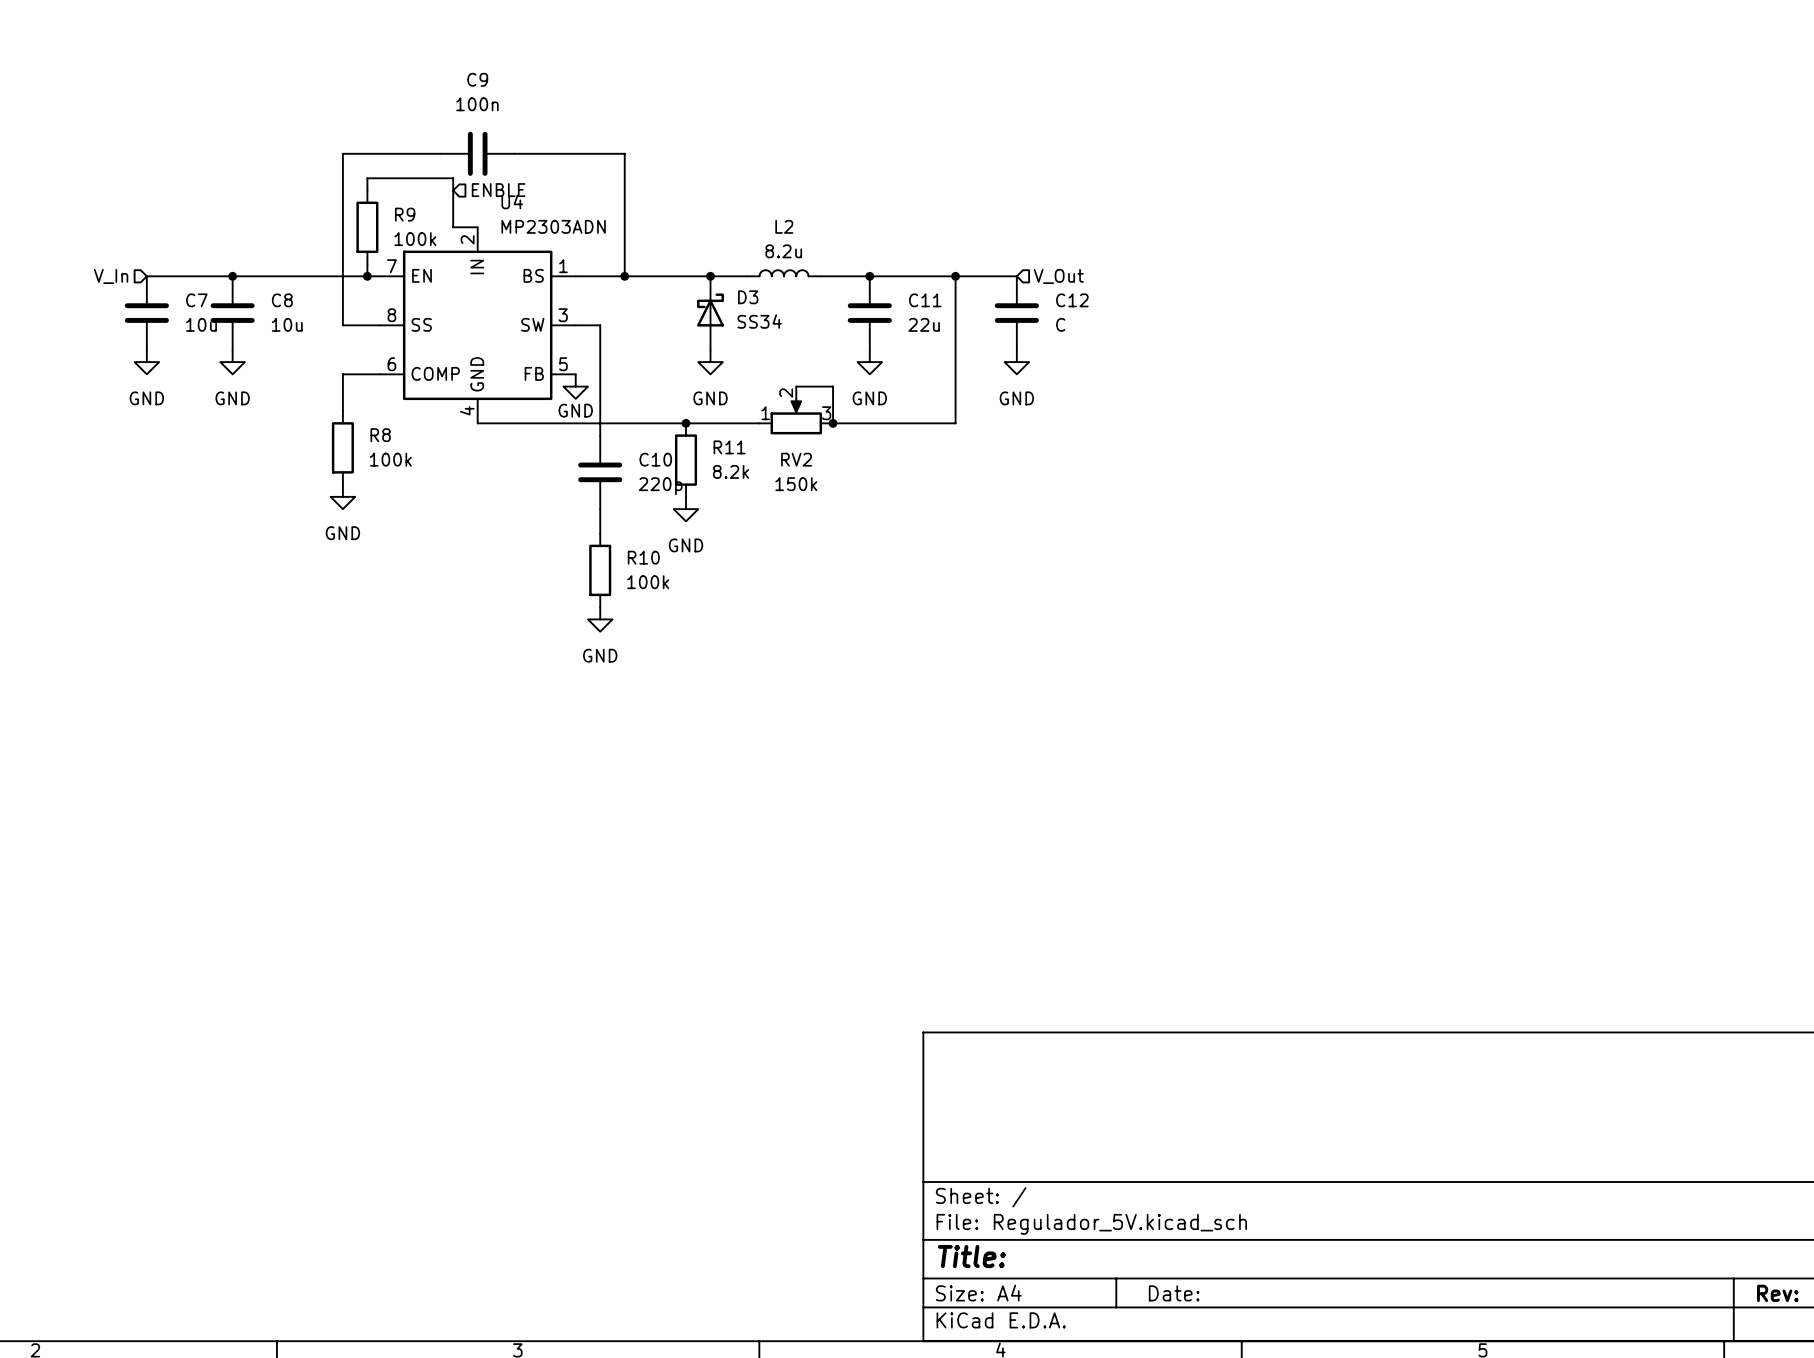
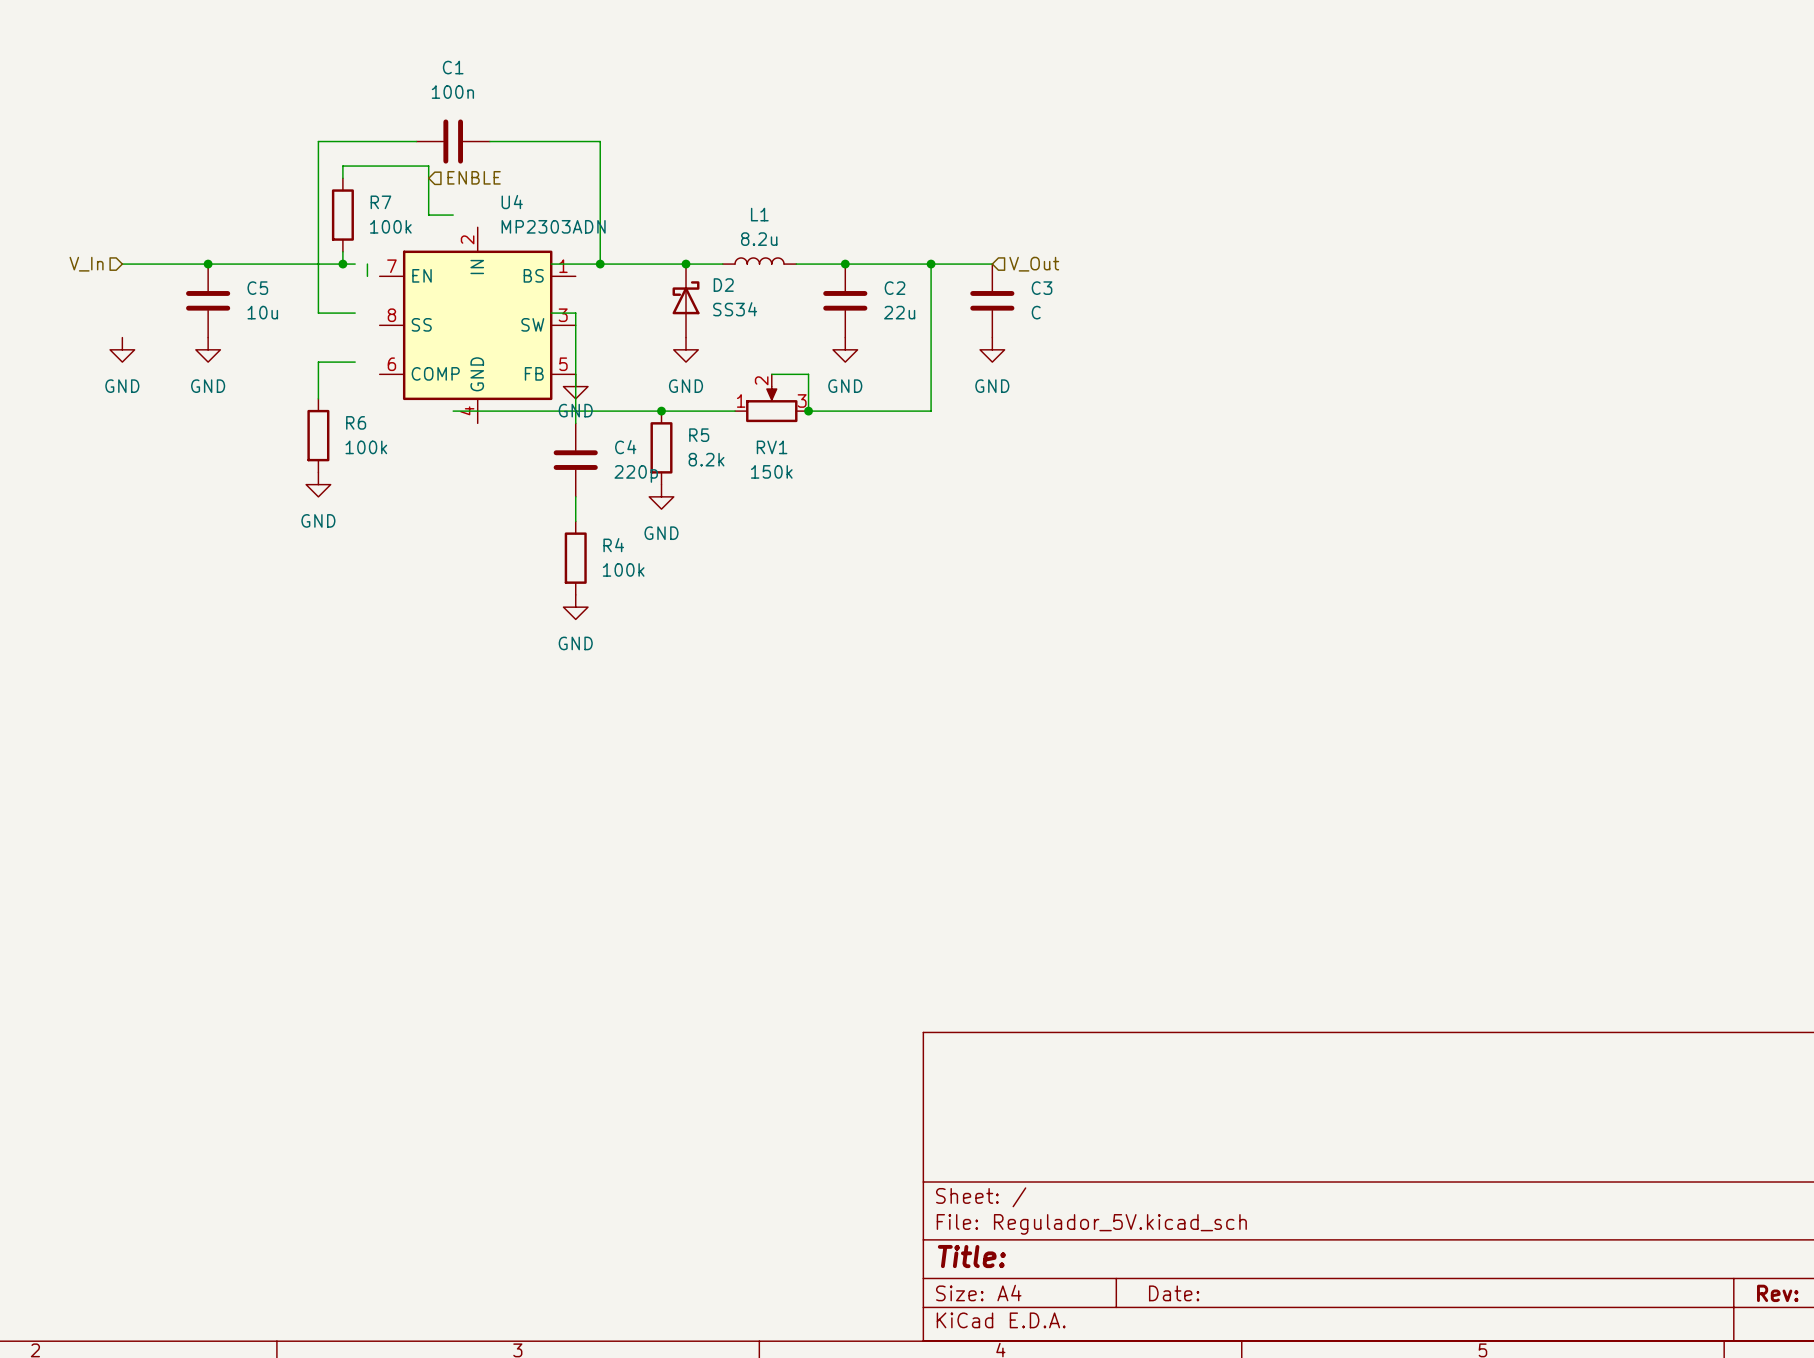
wire: none -> (416, 141) (318, 141) (318, 313) (355, 313)
C1: none -> 100n (453, 141)
wire: (440, 153) (342, 153) (342, 166) -> (453, 215) (428, 215) (428, 166) (342, 166)
C9: 100n (477, 153) -> none
wire: (514, 153) (624, 153) (624, 276) -> (489, 141) (600, 141) (600, 264)
wire: (342, 178) (342, 251) -> none
wire: (367, 190) (367, 178) (453, 178) (453, 227) (477, 227) -> none
hierarchical label position: ENBLE (498, 190) -> ENBLE (474, 177)
R7: none -> 100k (342, 215)
R9: 100k (367, 227) -> none
L1: none -> 8.2u (759, 261)
wire: (342, 264) (342, 325) (379, 325) -> none
L2: 8.2u (784, 273) -> none
hierarchical label position: V_In (111, 276) -> V_In (86, 264)
wire: (146, 276) (379, 276) -> (122, 264) (355, 264)
junction position: (232, 276) -> (208, 264)
junction position: (367, 276) -> (342, 264)
wire: (575, 276) (747, 276) -> (551, 264) (722, 264)
junction position: (624, 276) -> (600, 264)
junction position: (710, 276) -> (686, 264)
wire: (820, 276) (1016, 276) -> (796, 264) (992, 264)
junction position: (869, 276) -> (845, 264)
wire: (955, 276) (955, 423) (833, 423) (833, 386) (796, 386) -> (931, 264) (931, 411) (808, 411) (808, 374) (771, 374)
junction position: (955, 276) -> (931, 264)
hierarchical label position: V_Out (1058, 276) -> V_Out (1034, 264)
C5: none -> 10u (208, 300)
D2: none -> SS34 (686, 300)
C2: none -> 22u (845, 300)
C3: none -> C (992, 300)
C7: 10u (146, 313) -> none
C8: 10u (232, 313) -> none
D3: SS34 (710, 313) -> none
C11: 22u (869, 313) -> none
C12: C (1016, 313) -> none
wire: (575, 325) (600, 325) (600, 435) -> (551, 313) (575, 313) (575, 423)
power symbol position: GND (146, 362) -> GND (122, 349)
power symbol position: GND (232, 362) -> GND (208, 349)
power symbol position: GND (710, 362) -> GND (686, 349)
power symbol position: GND (869, 362) -> GND (845, 349)
power symbol position: GND (1016, 362) -> GND (992, 349)
wire: (379, 374) (342, 374) (342, 411) -> (355, 362) (318, 362) (318, 398)
RV1: none -> 150k (771, 398)
RV2: 150k (796, 410) -> none
wire: (477, 423) (759, 423) -> (453, 411) (735, 411)
junction position: (686, 423) -> (661, 411)
junction position: (833, 423) -> (808, 411)
R6: none -> 100k (318, 435)
R8: 100k (342, 447) -> none
R5: none -> 8.2k (661, 447)
C4: none -> 220p (575, 460)
R11: 8.2k (686, 460) -> none
C10: 220p (600, 472) -> none
power symbol position: GND (342, 496) -> GND (318, 484)
wire: (600, 509) (600, 533) -> (575, 496) (575, 521)
power symbol position: GND (686, 509) -> GND (661, 496)
R4: none -> 100k (575, 558)
R10: 100k (600, 570) -> none
power symbol position: GND (600, 619) -> GND (575, 607)

